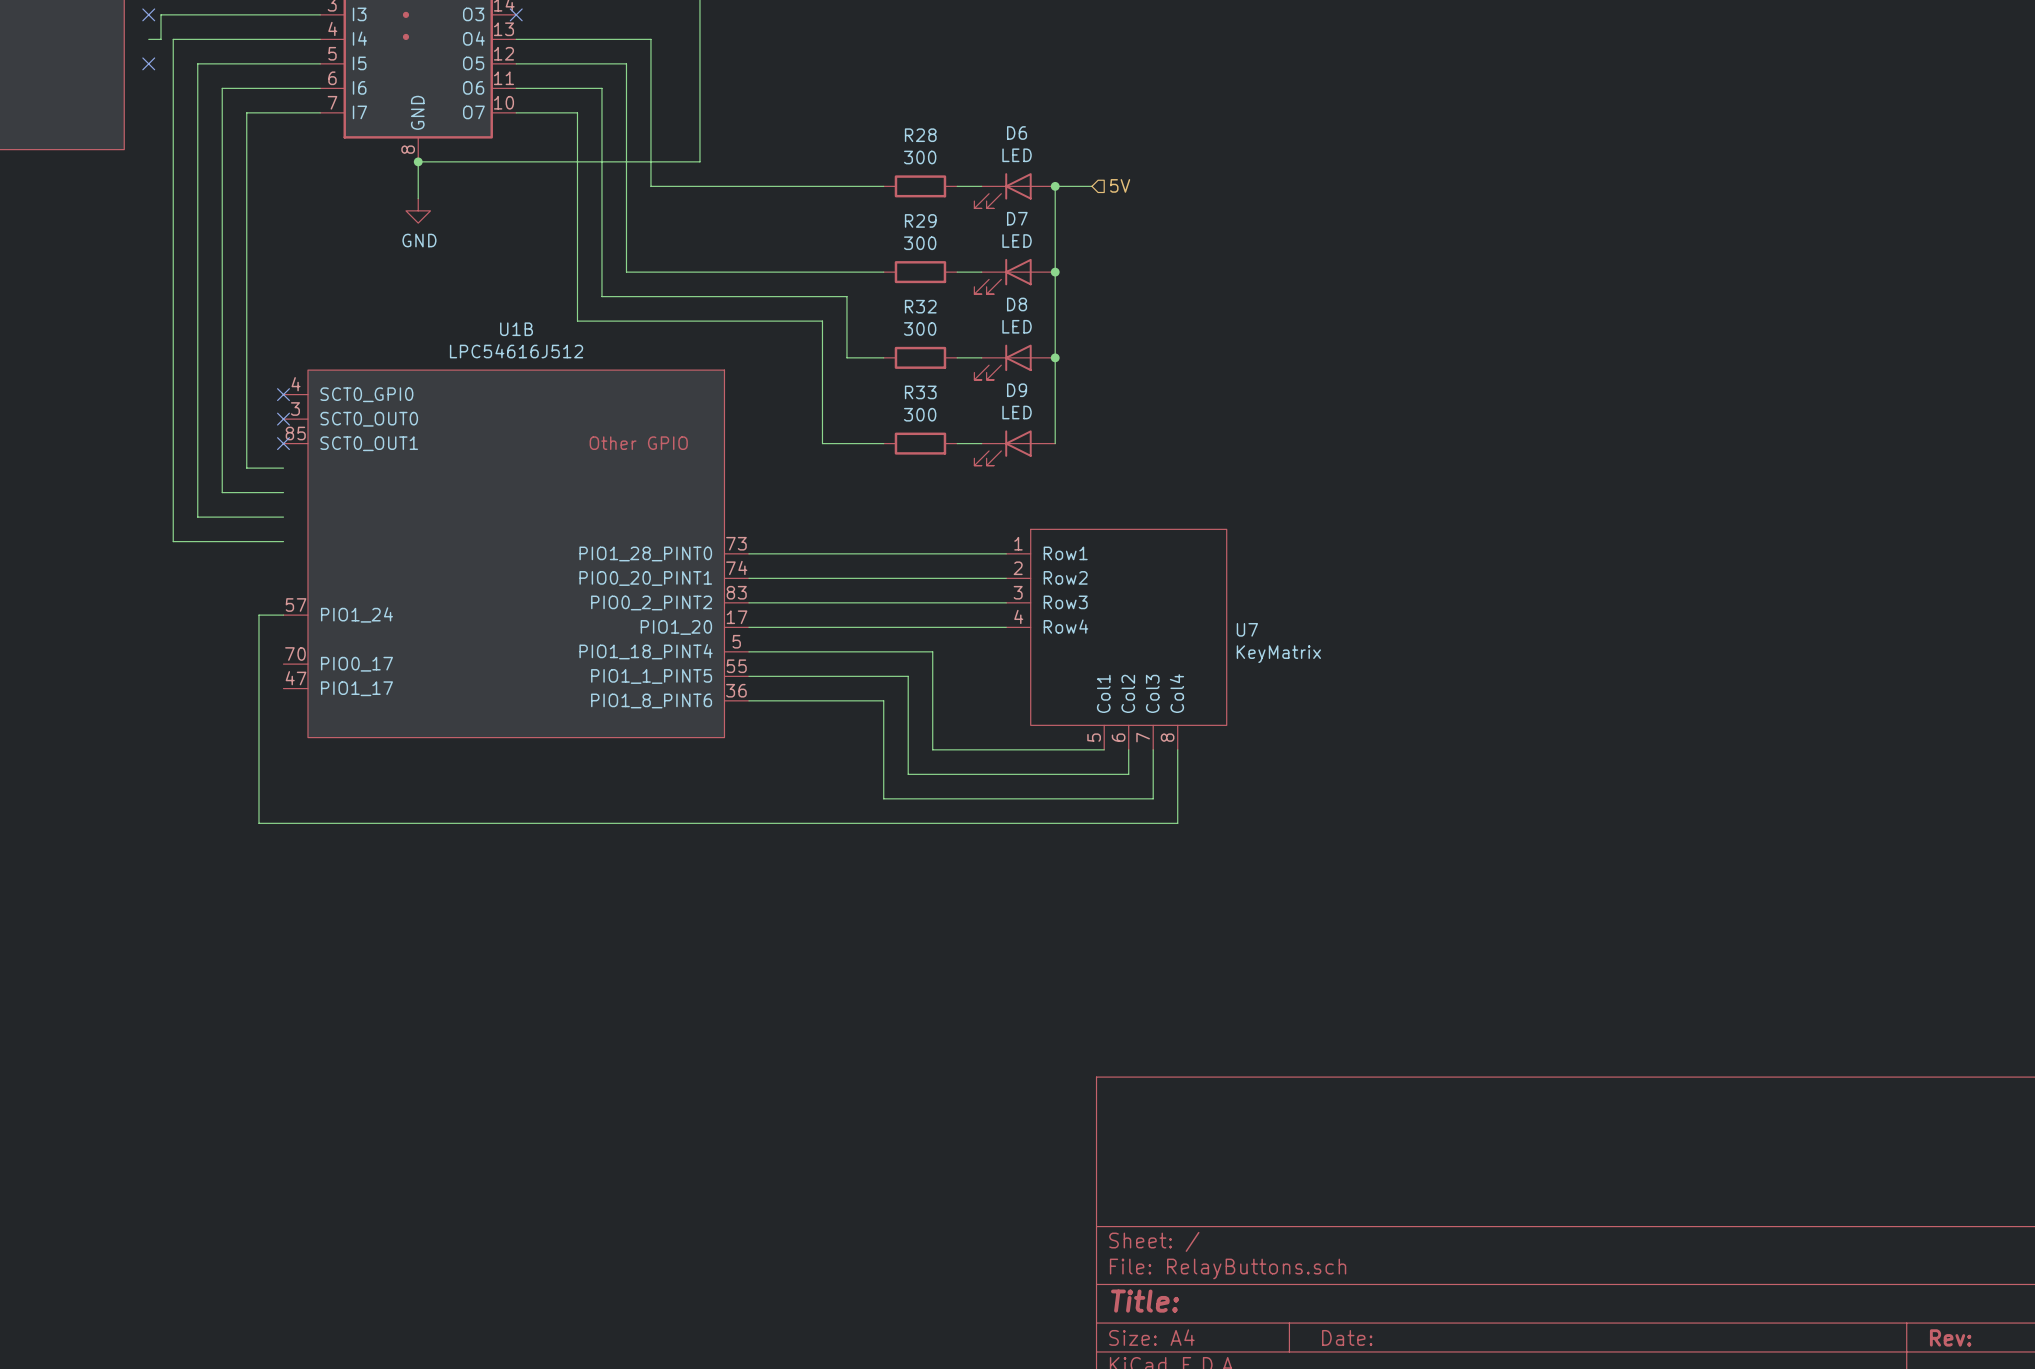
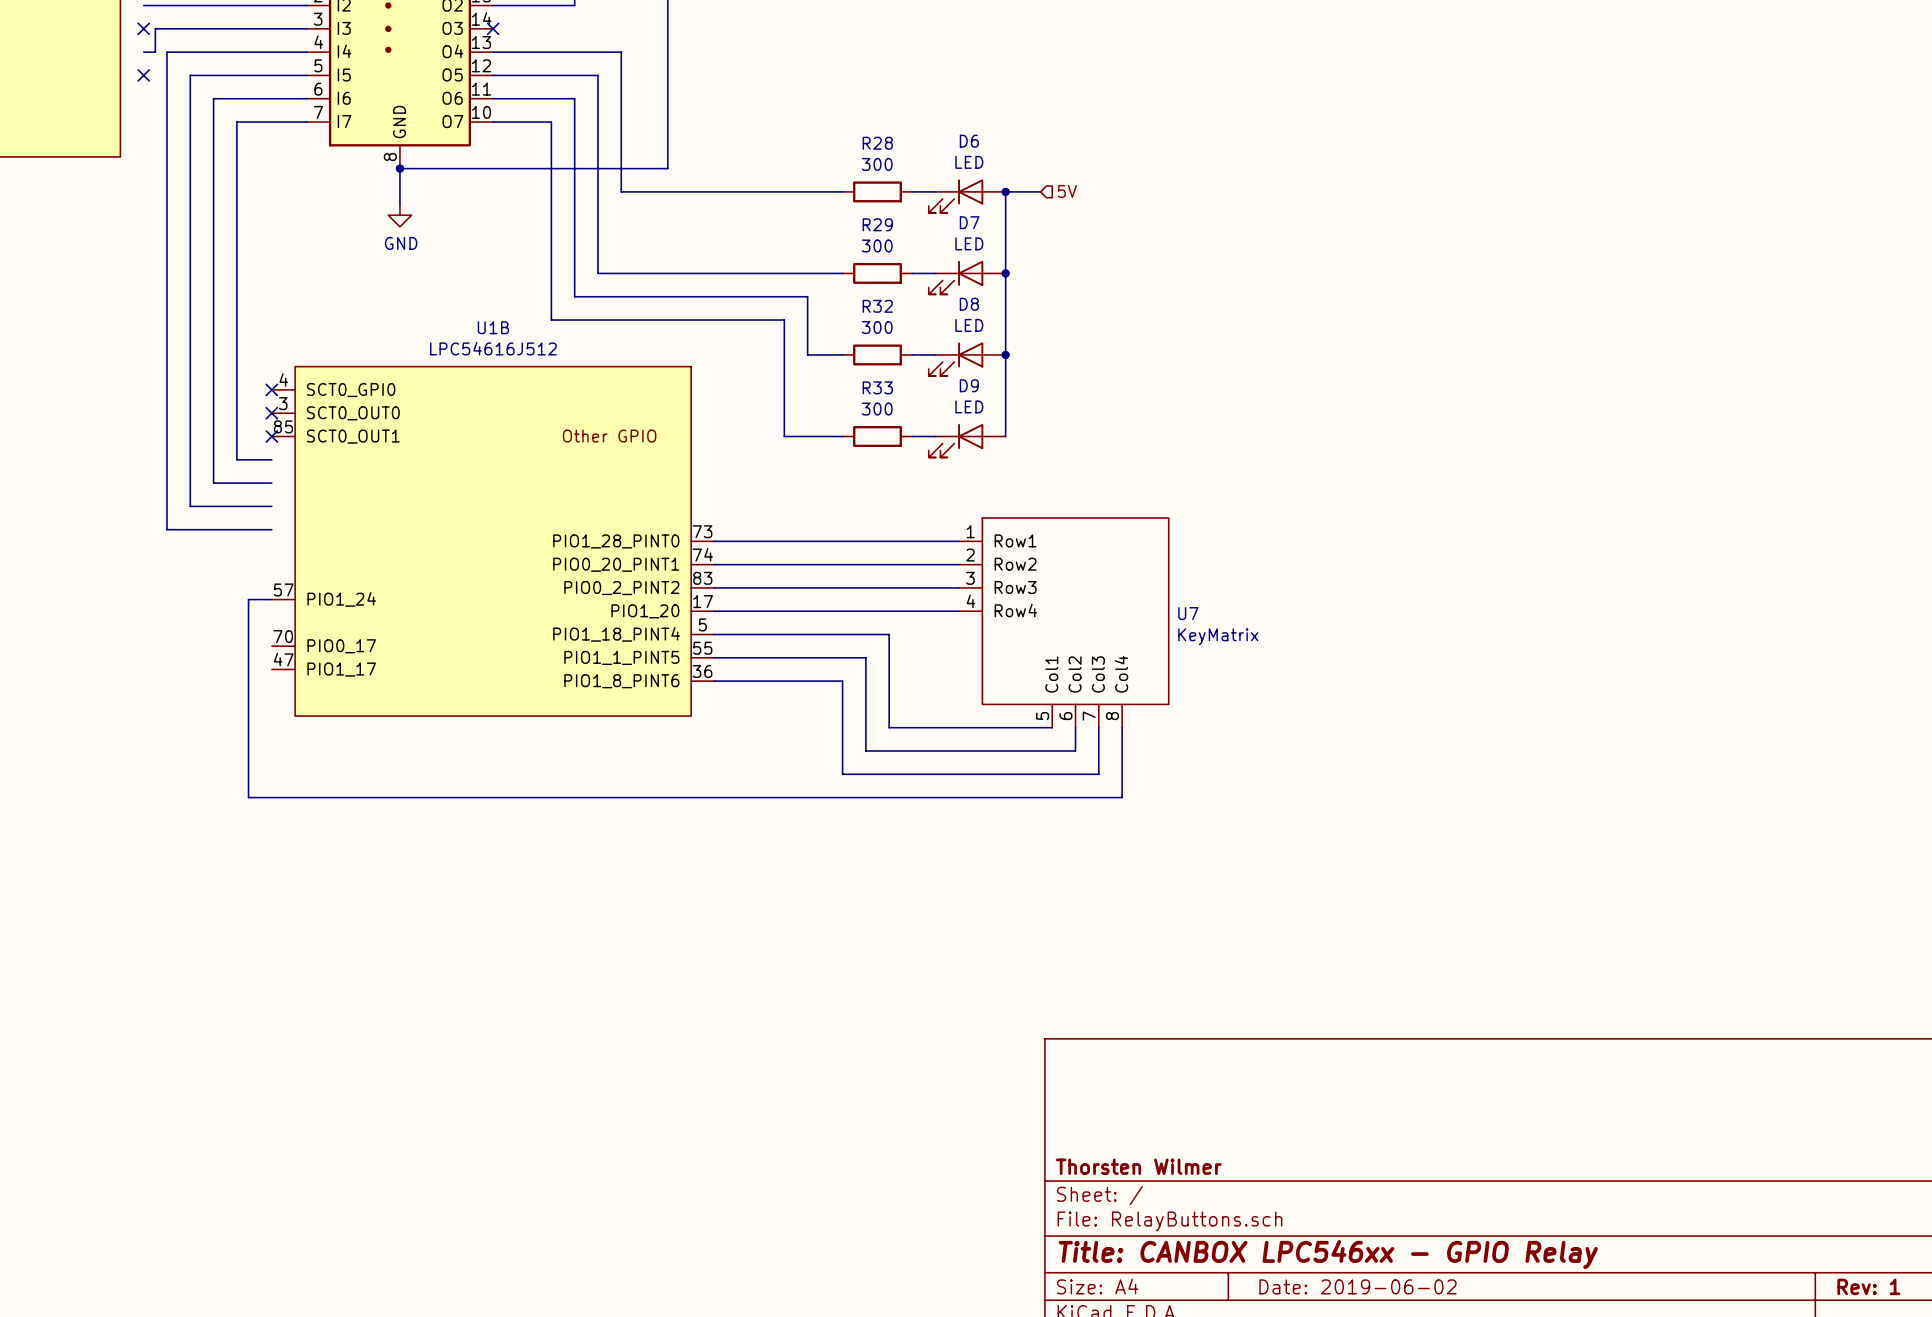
title block: none -> Thorsten Wilmer (1138, 1166)
title block: Title: (1145, 1301) -> Title: CANBOX LPC546xx - GPIO Relay (1328, 1254)
title block: Date: (1347, 1337) -> Date: 2019-06-02 (1357, 1286)
title block: Rev: (1950, 1337) -> Rev: 1 (1868, 1286)

